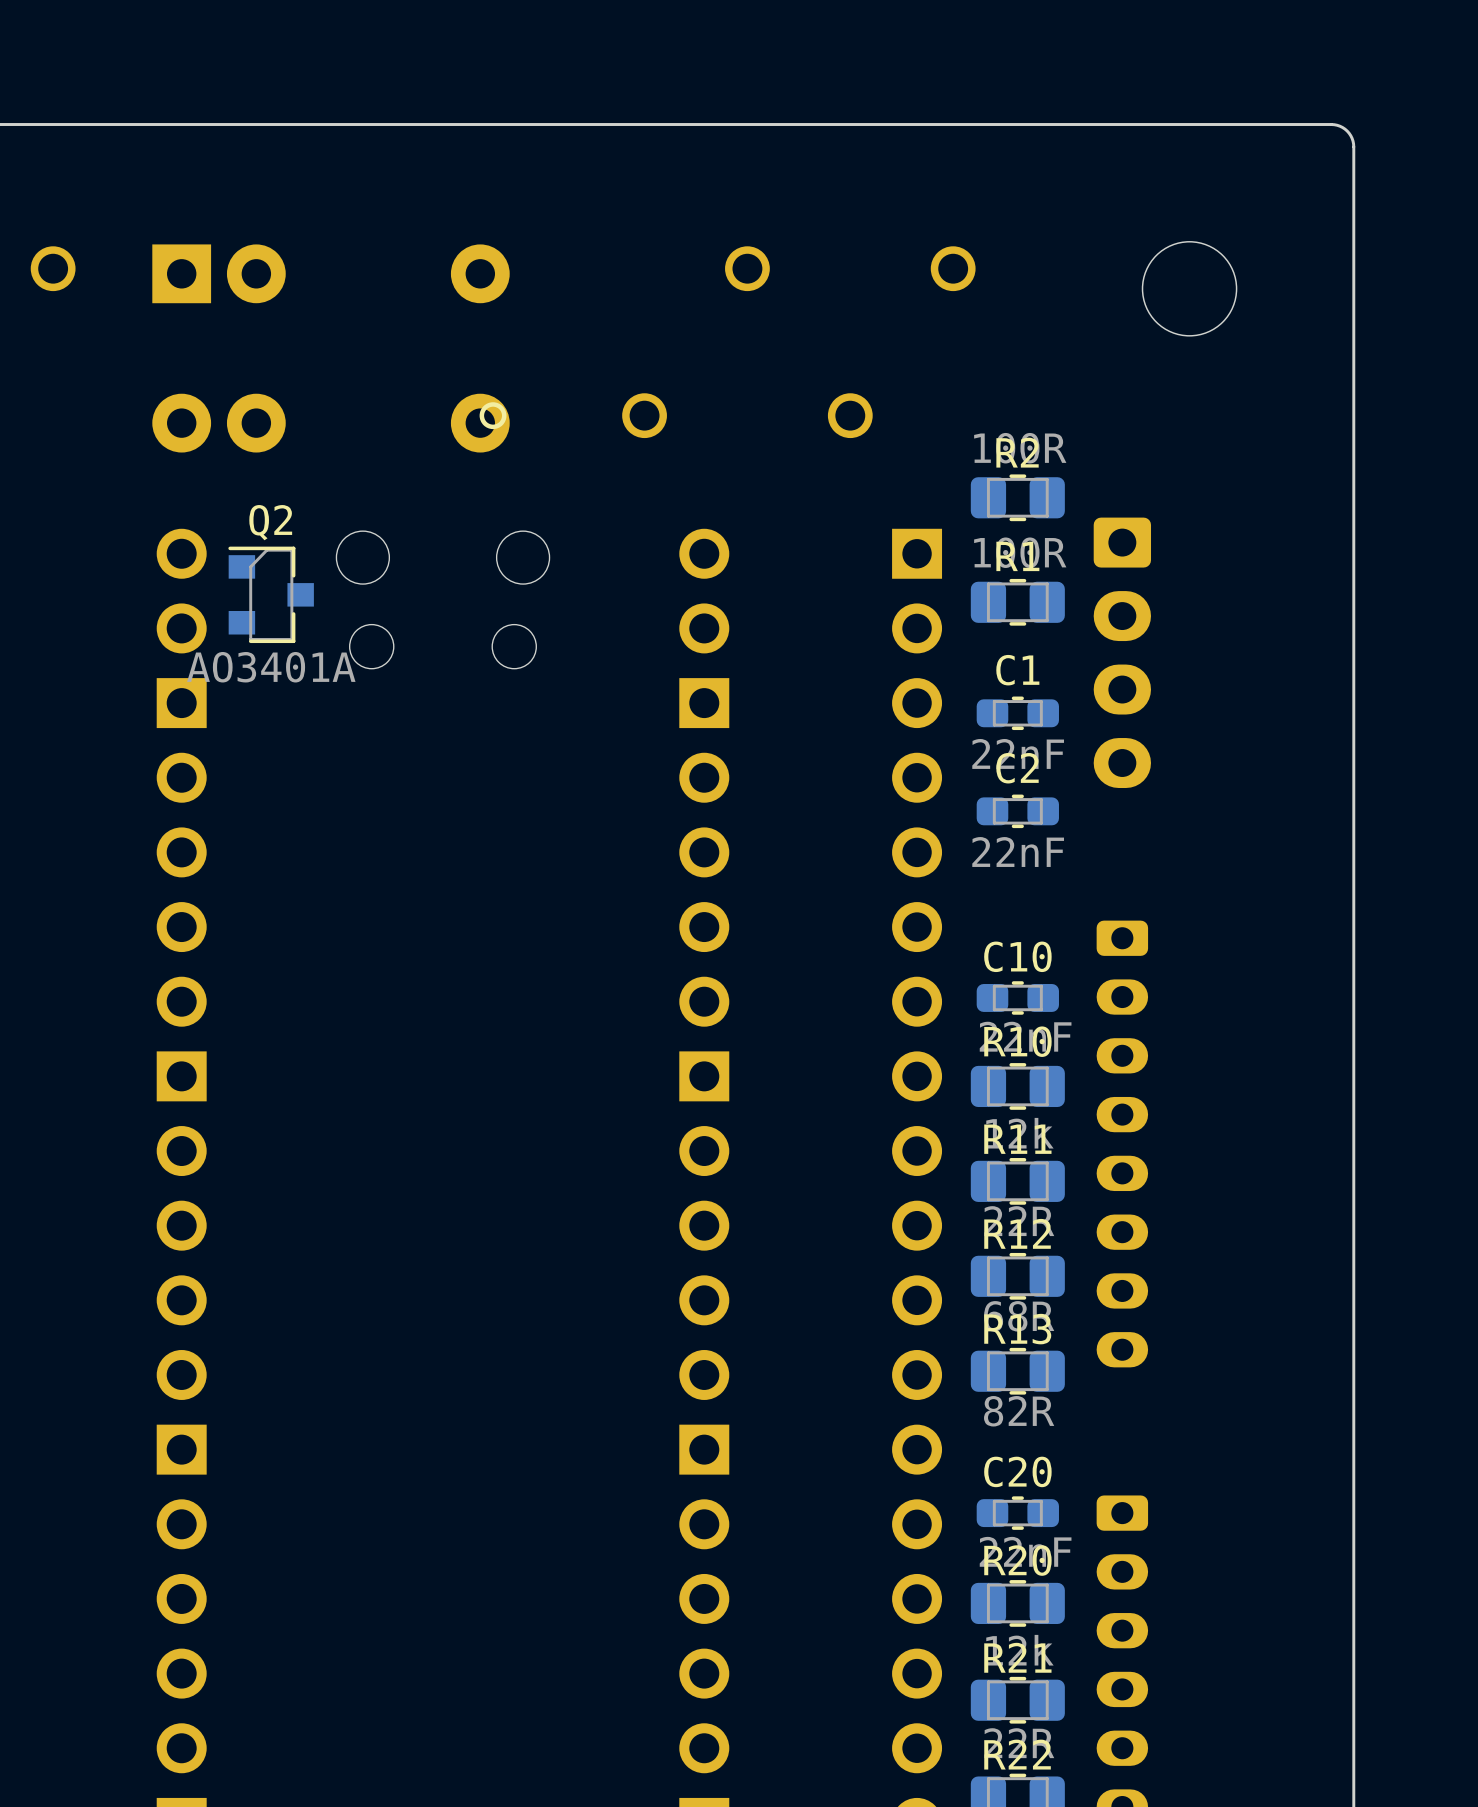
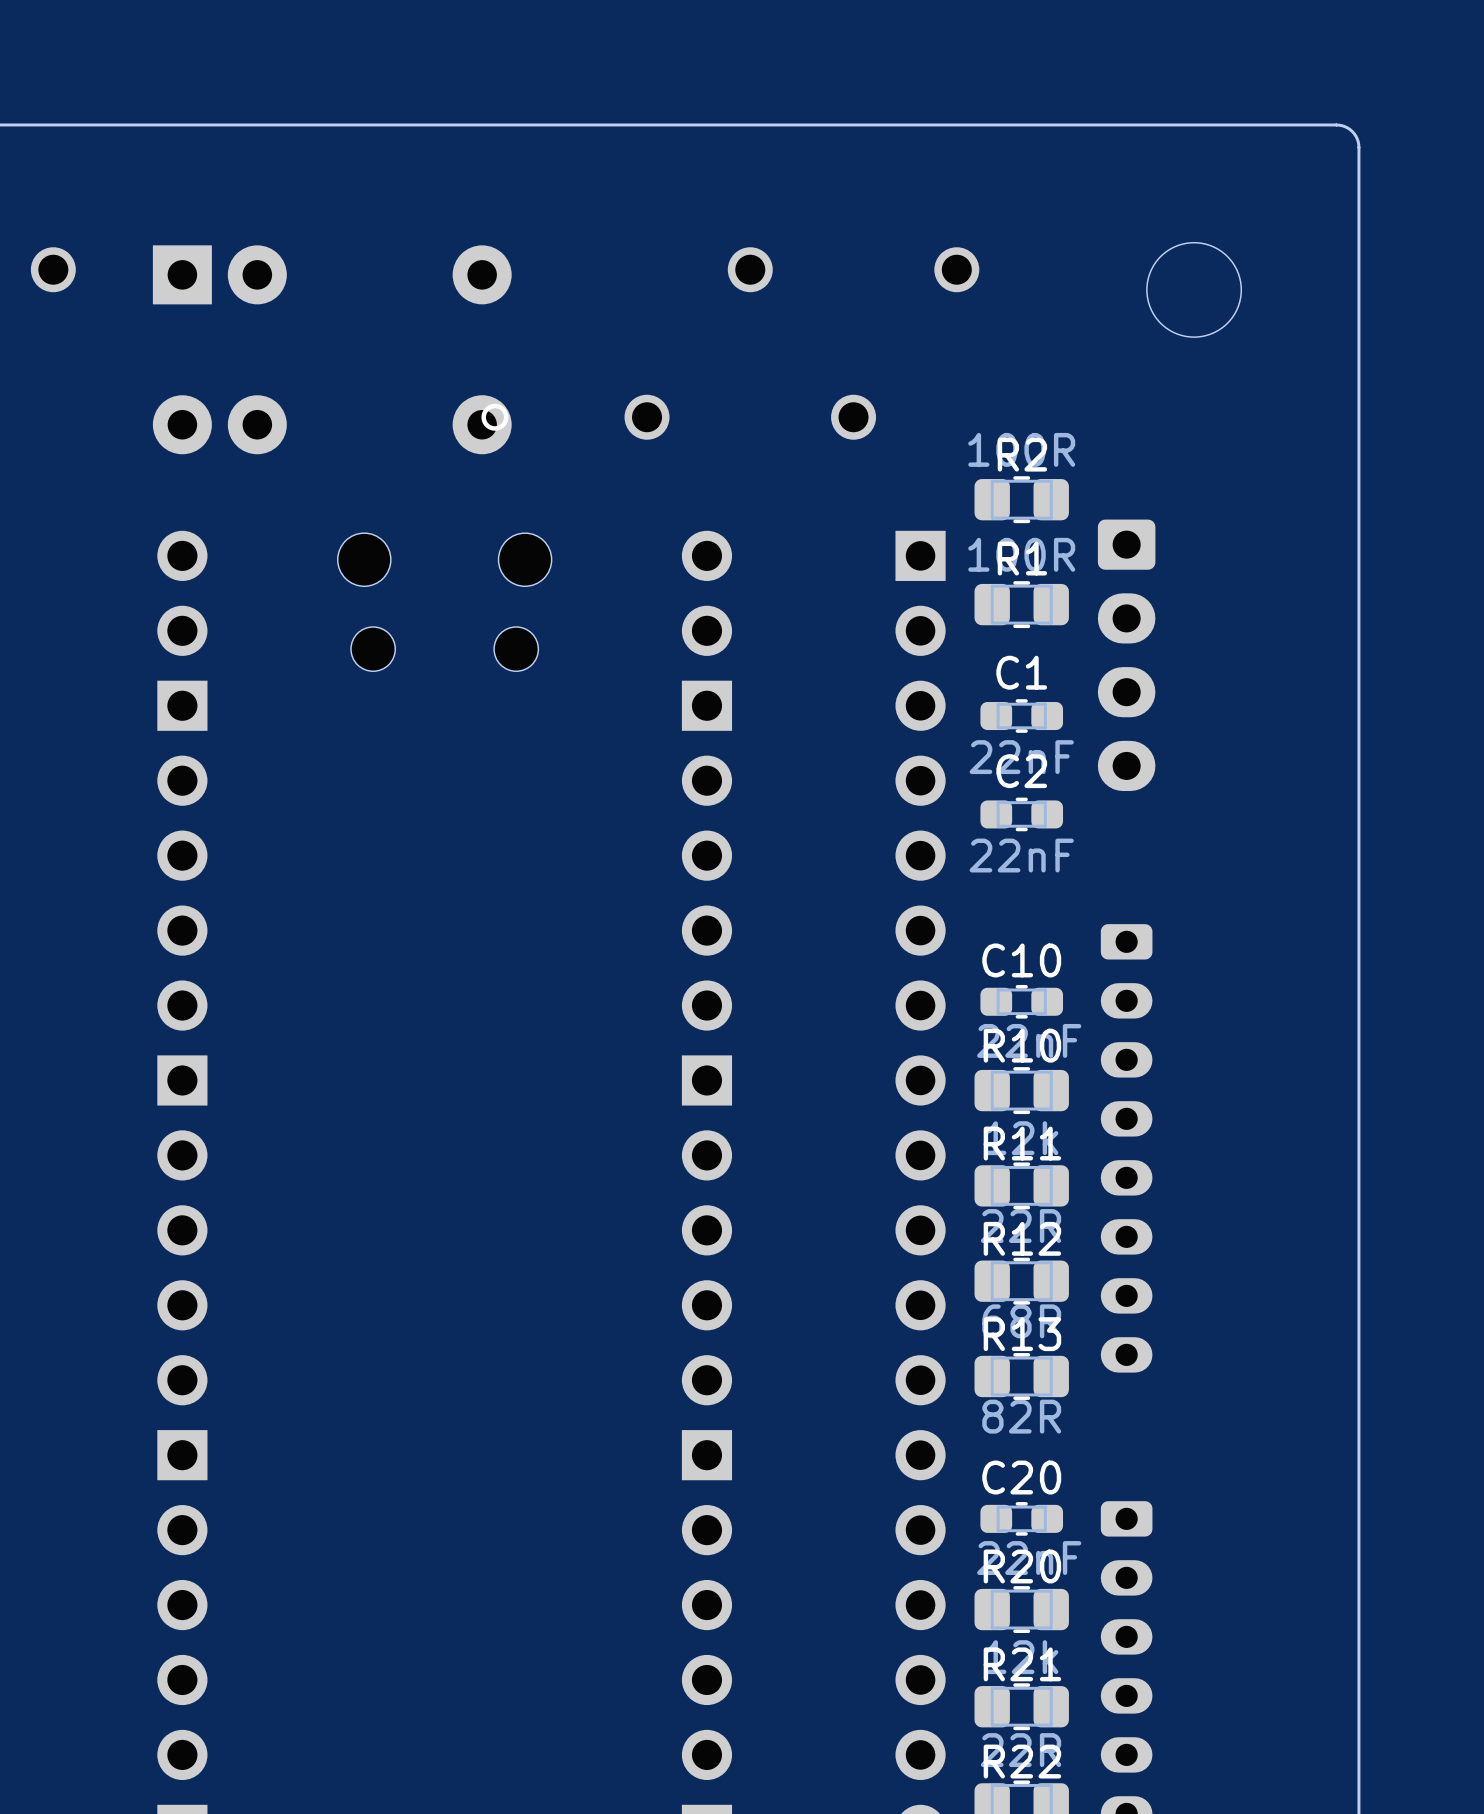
Q2: AO3401A (271, 594) -> none

